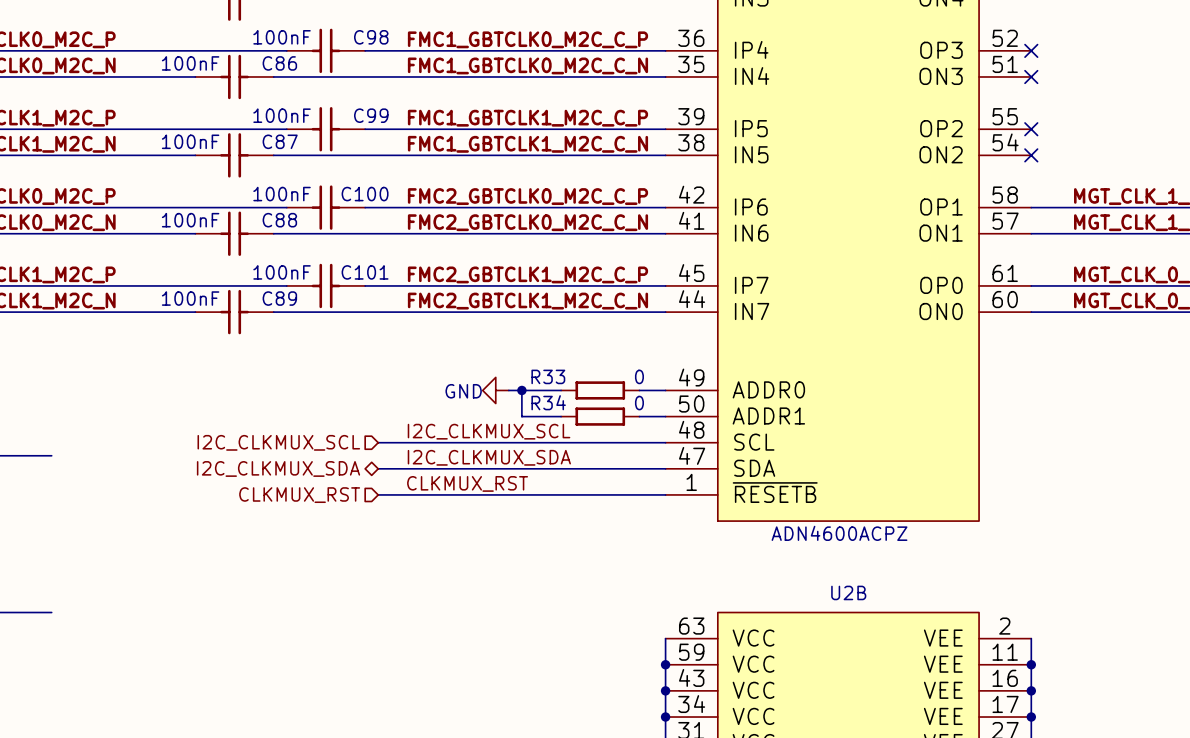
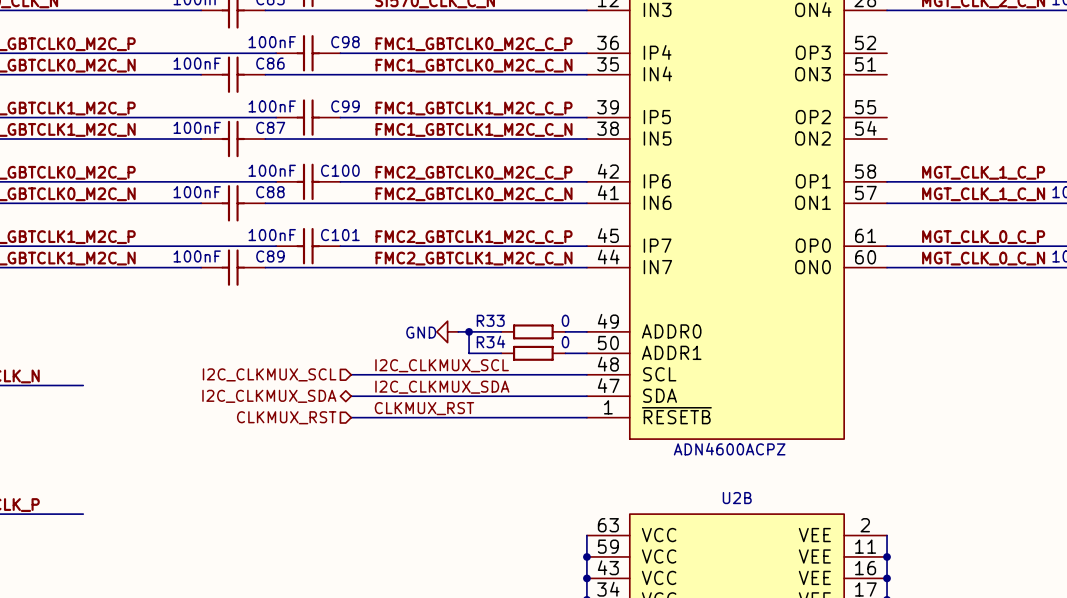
no-connect mark: (1031, 50) -> none
no-connect mark: (1031, 76) -> none
no-connect mark: (1031, 129) -> none
no-connect mark: (1031, 155) -> none

